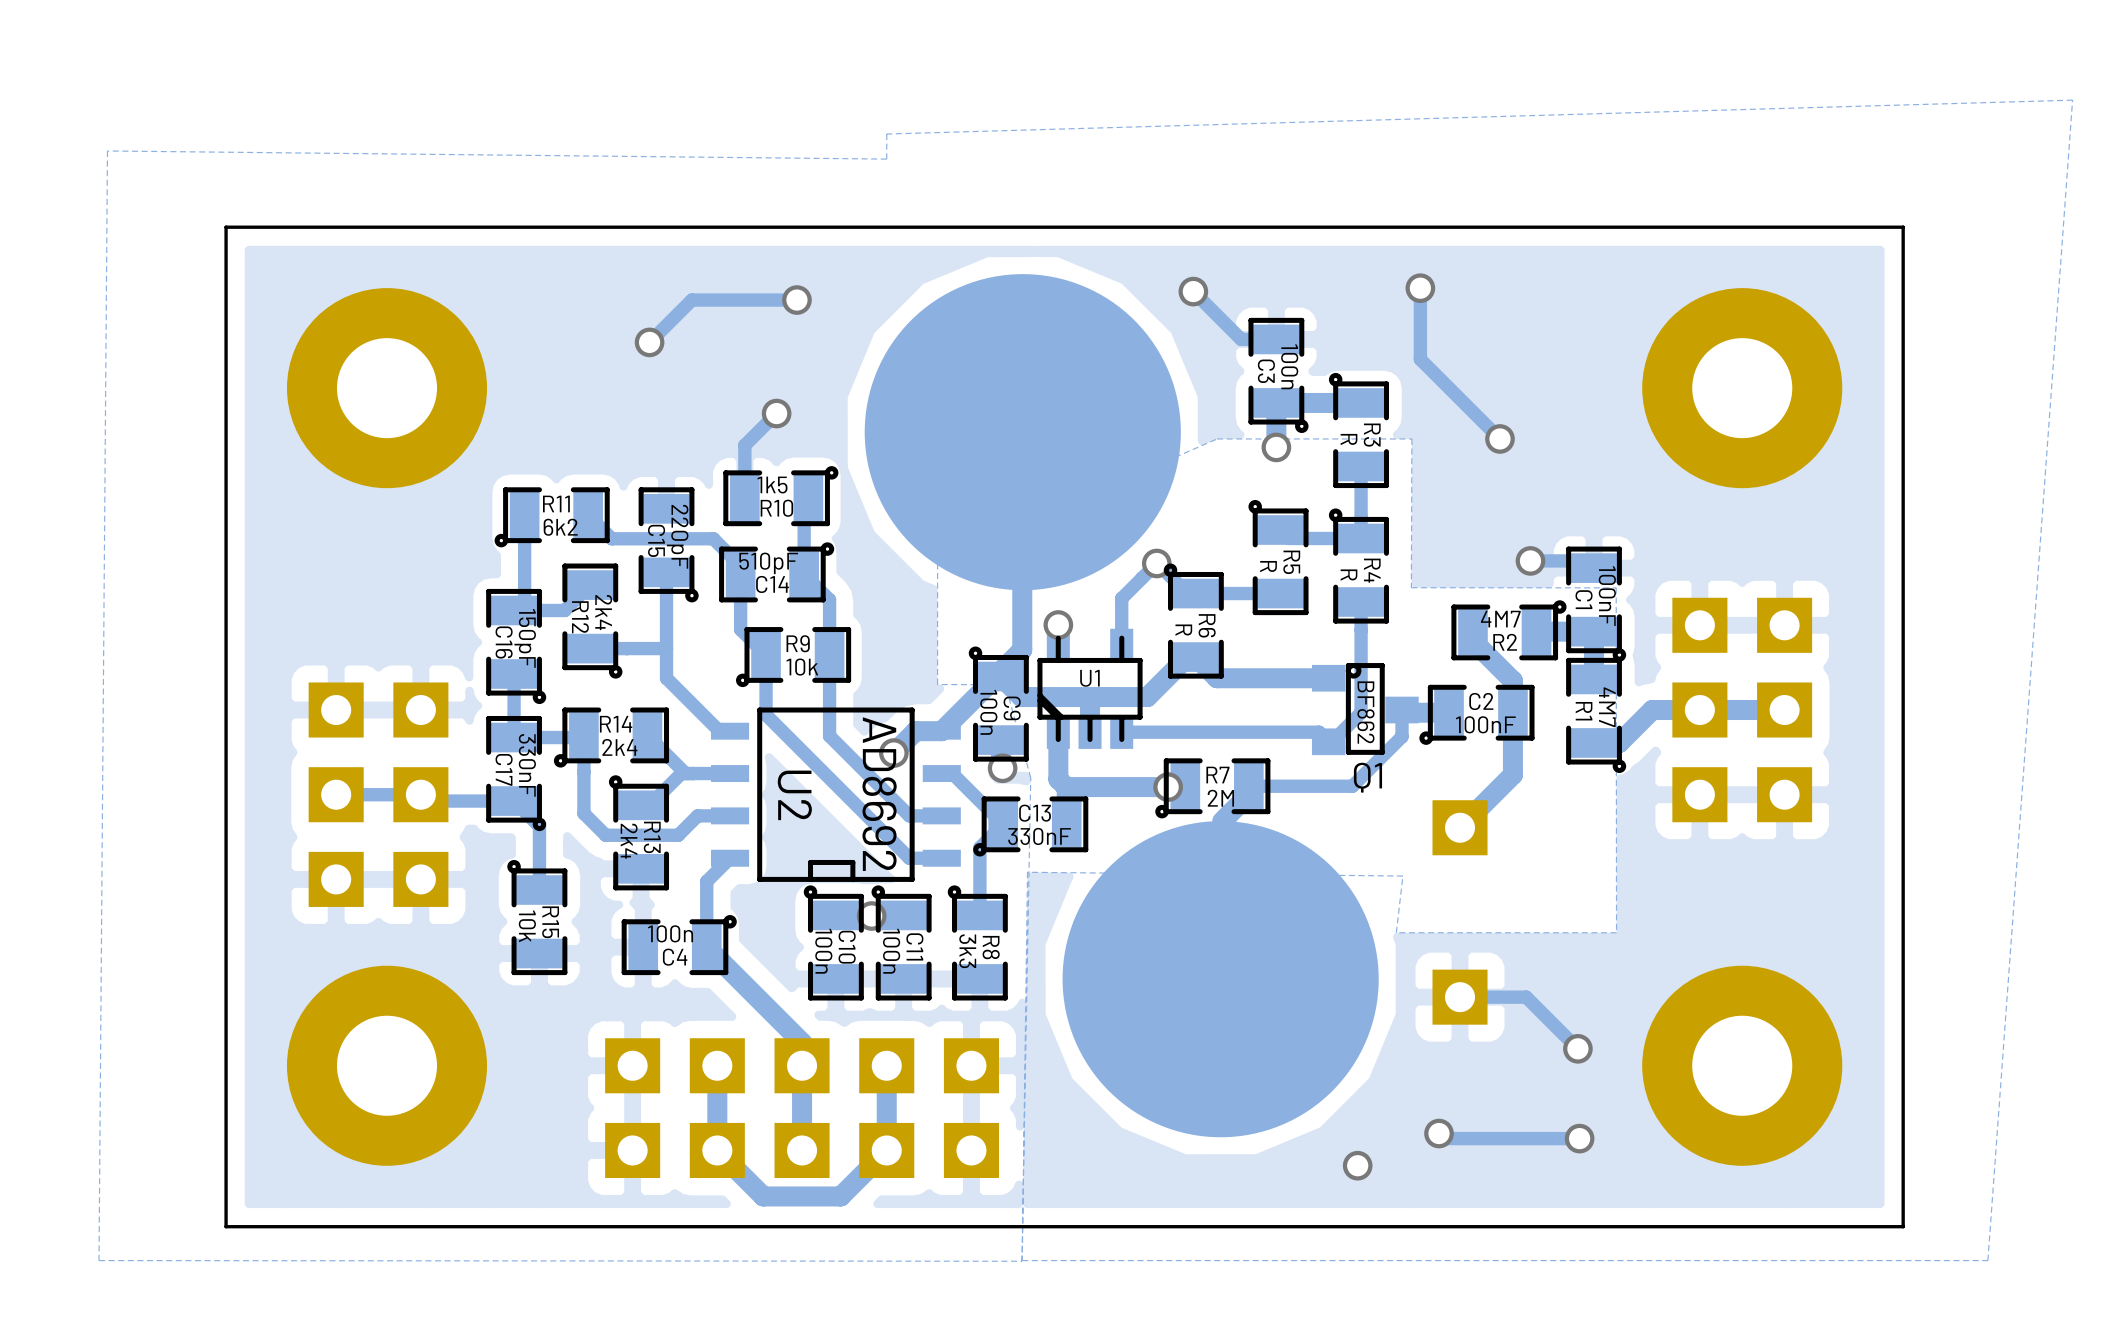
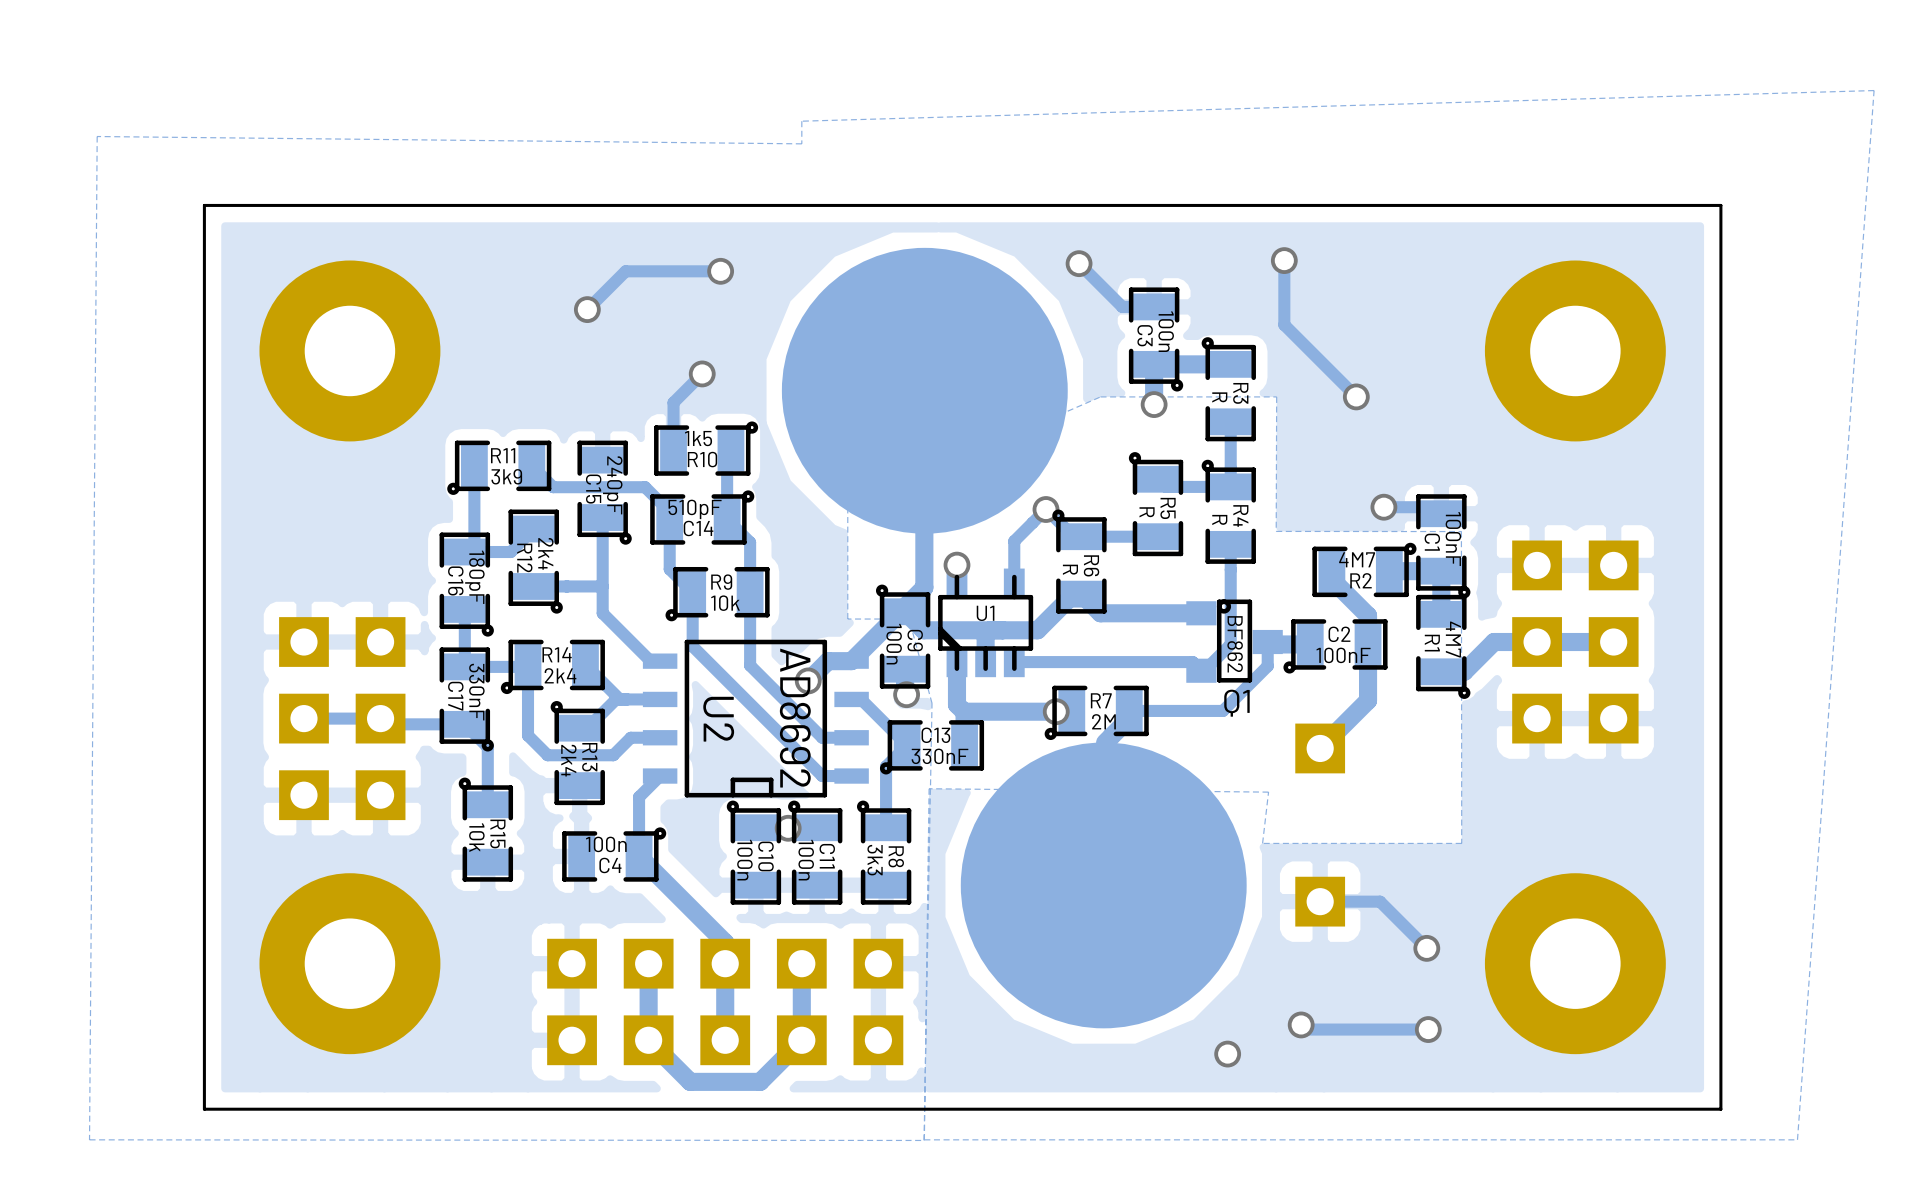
R11 value: 6k2 (560, 527) -> 3k9 (506, 476)
C15 value: 220pF (677, 536) -> 240pF (612, 485)
C16 value: 150pF (525, 638) -> 180pF (474, 577)

